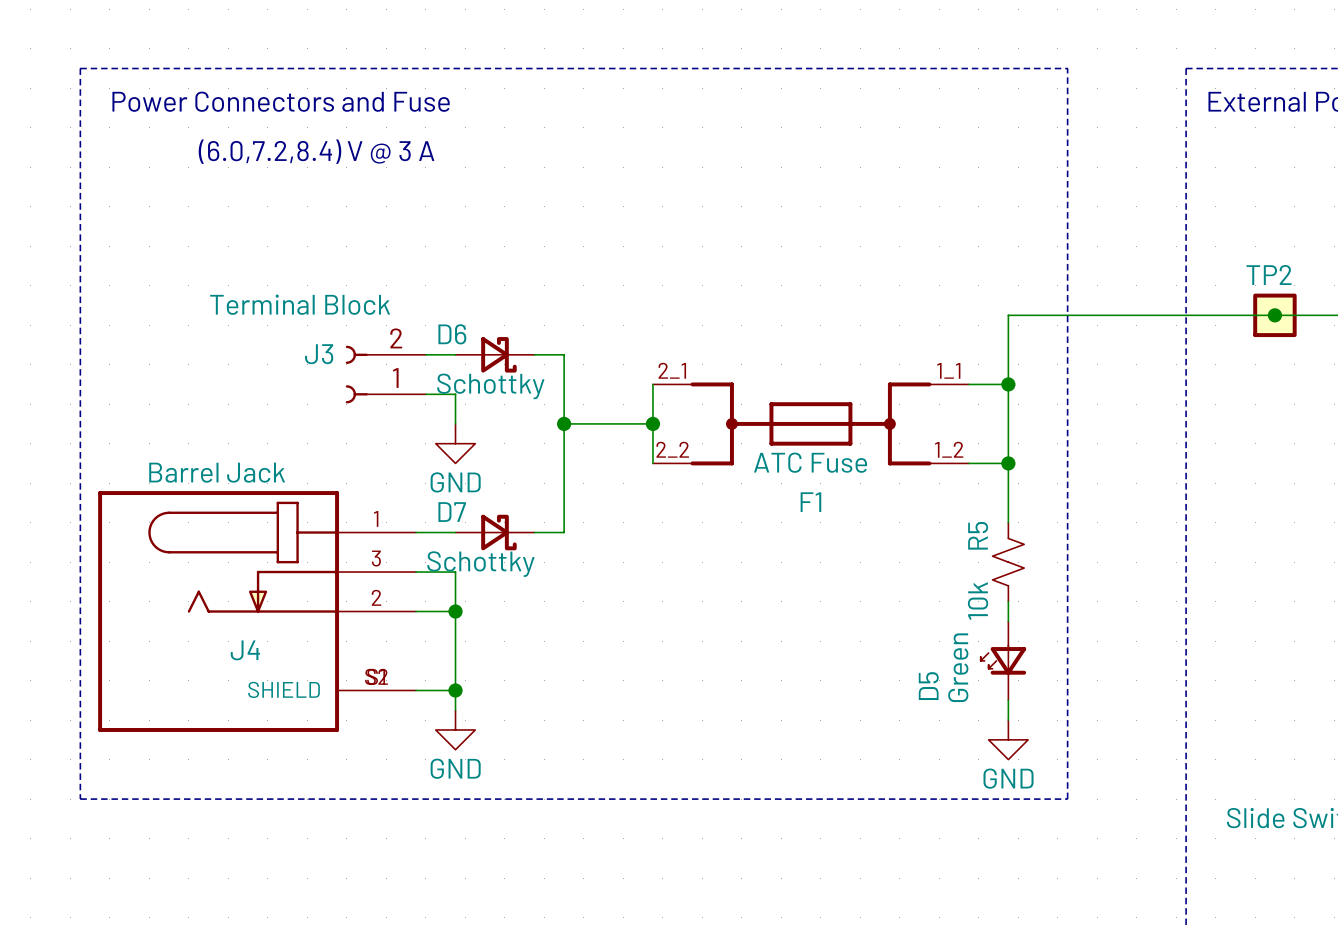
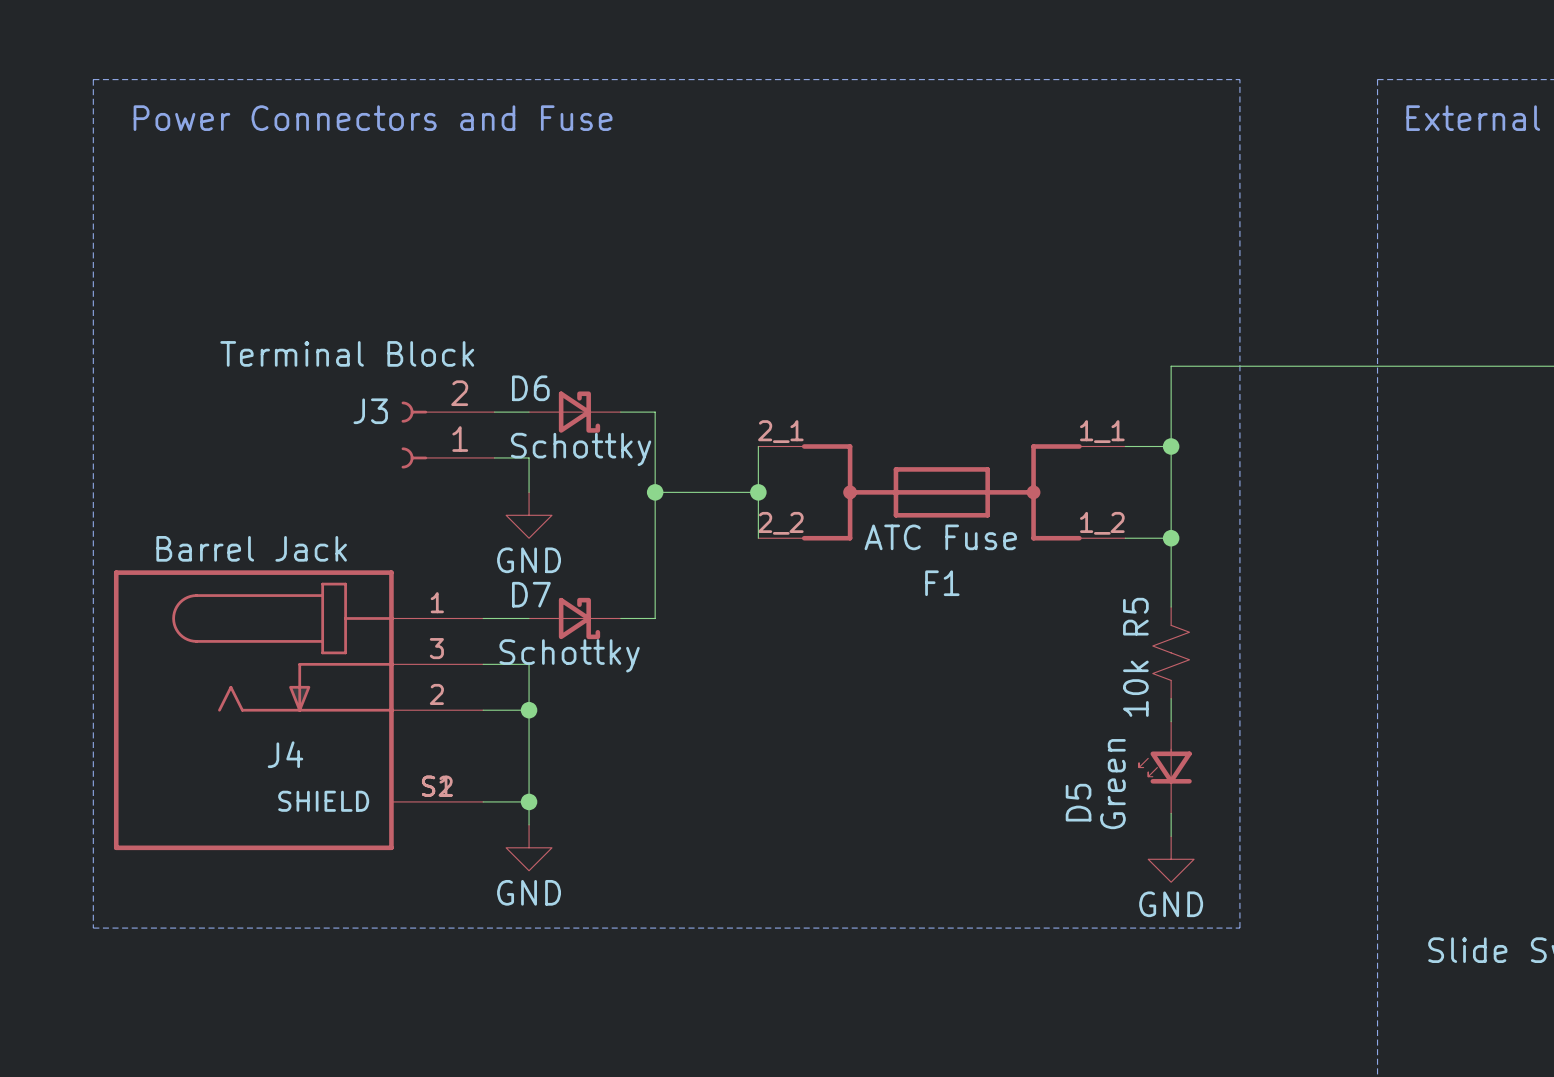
text: (6.0,7.2,8.4) V @ 3 A (316, 151) -> none
junction: (1274, 315) -> none
TP2: (1274, 315) -> none

